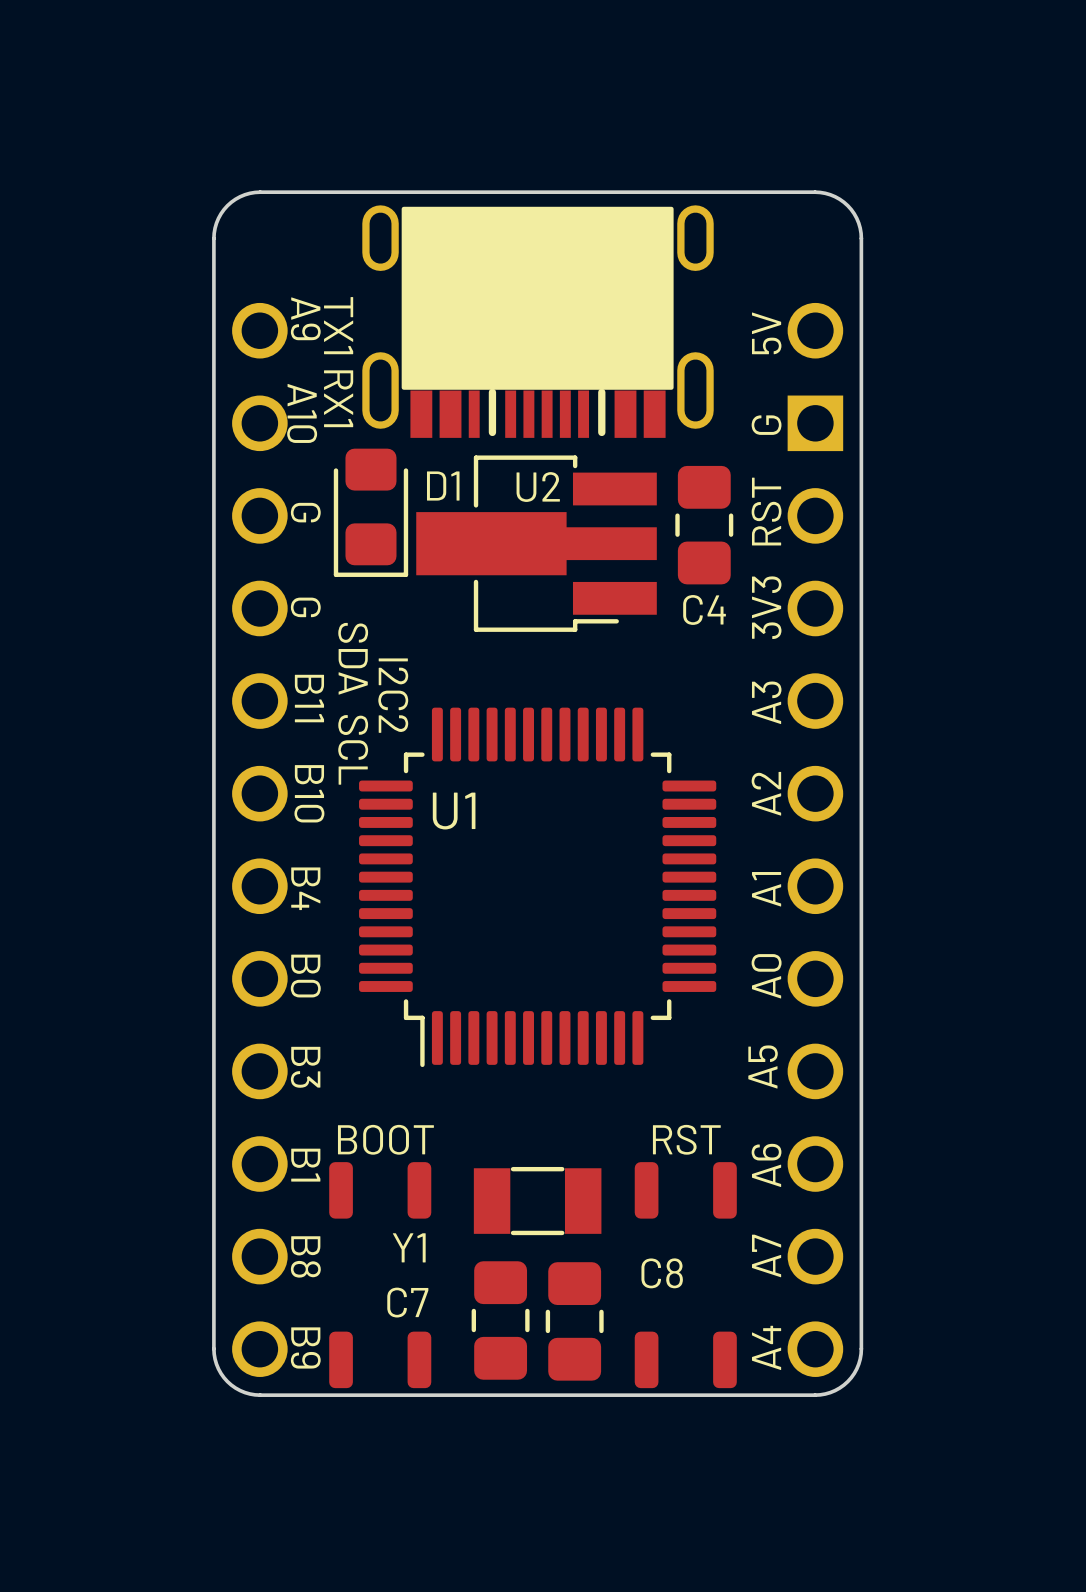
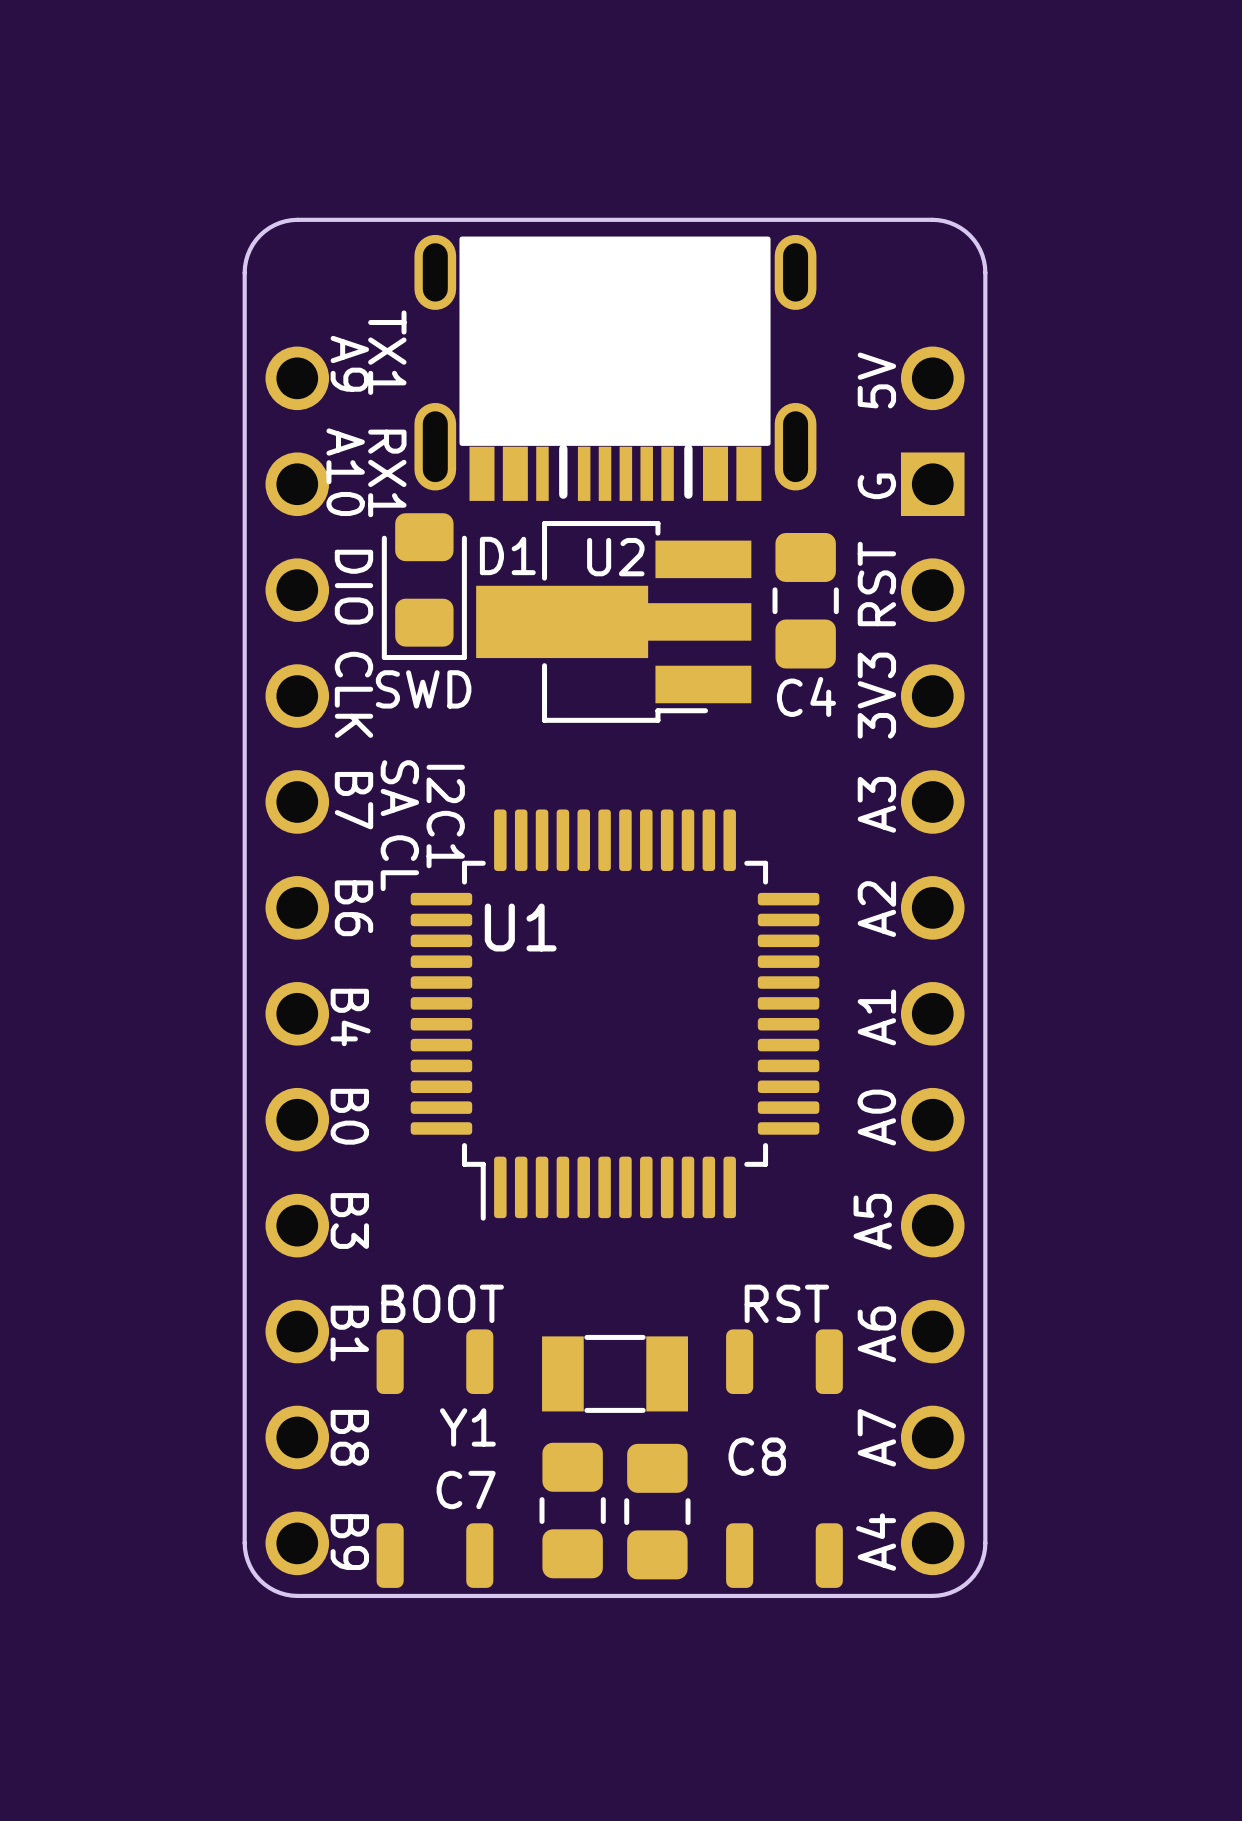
text: G (305, 512) -> DIO (353, 587)
text: none -> SWD (423, 689)
text: G (305, 607) -> CLK (353, 694)
text: SDA (353, 658) -> none
text: none -> SA (399, 788)
text: I2C2 (393, 695) -> I2C1 (445, 816)
text: B11 (309, 698) -> B7 (353, 800)
text: SCL (353, 749) -> CL (399, 863)
text: B10 (309, 793) -> B6 (353, 908)

